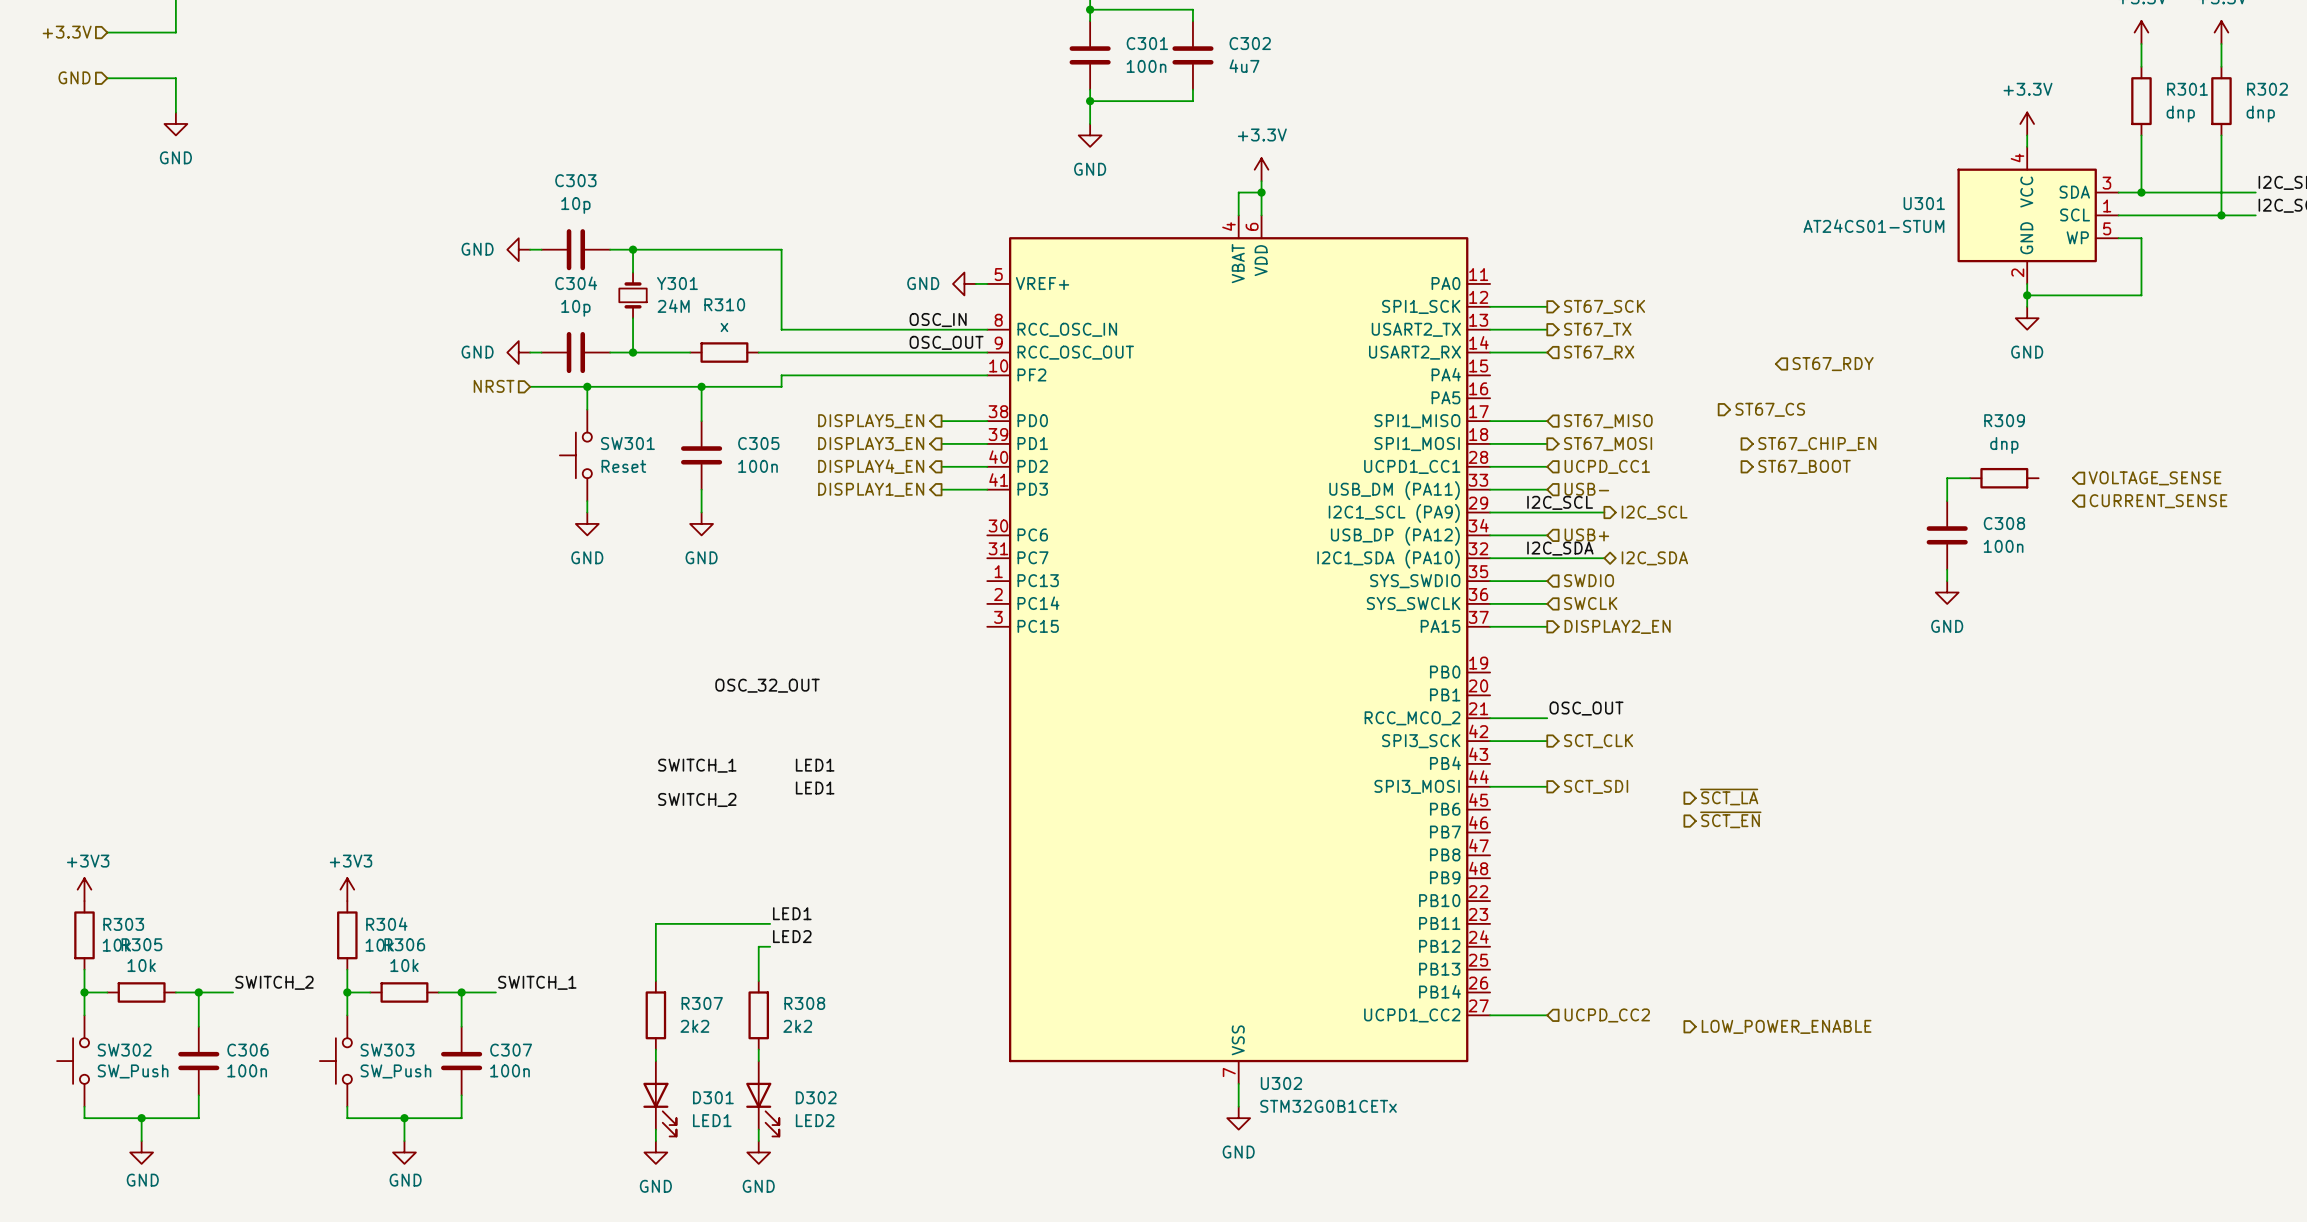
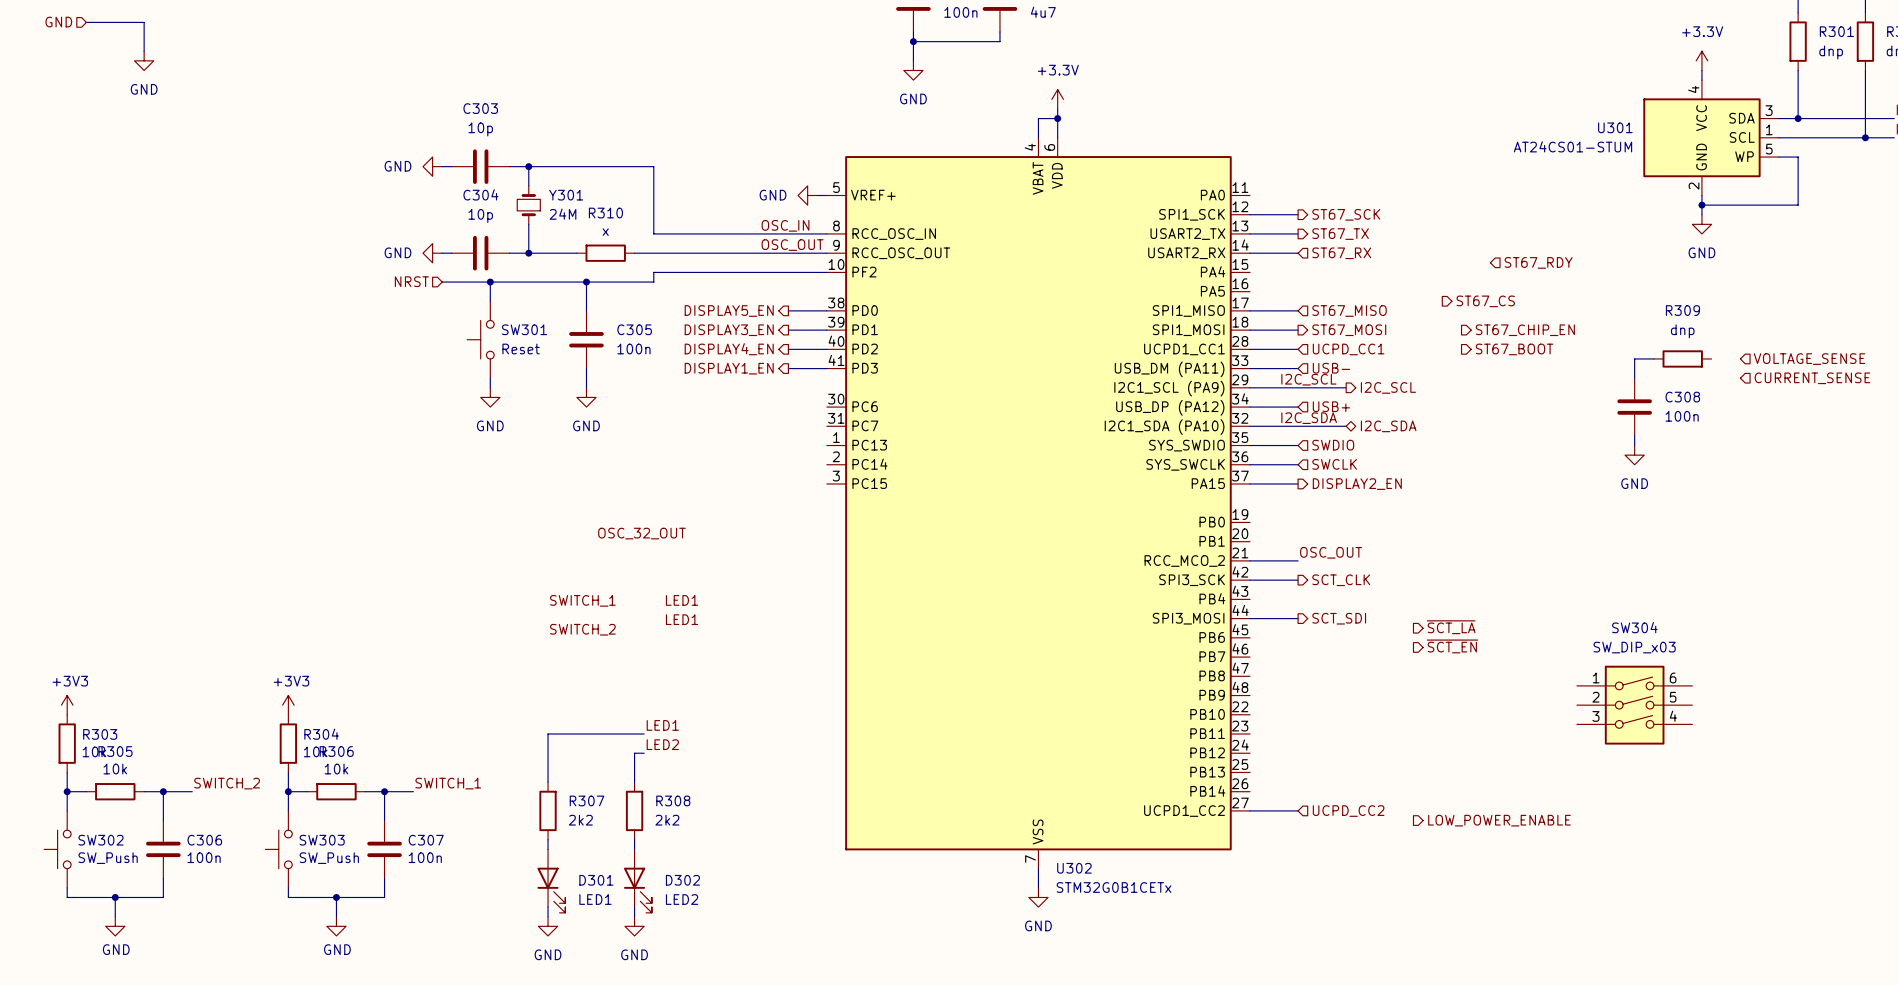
SW304: none -> SW_DIP_x03 (1634, 705)

